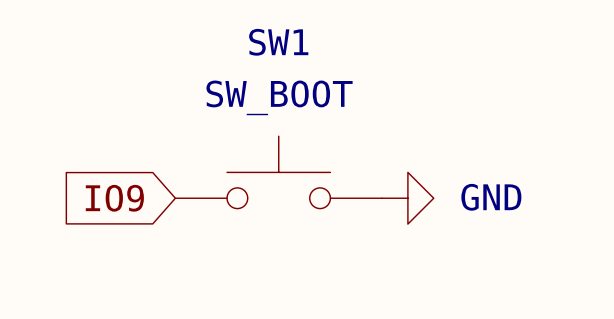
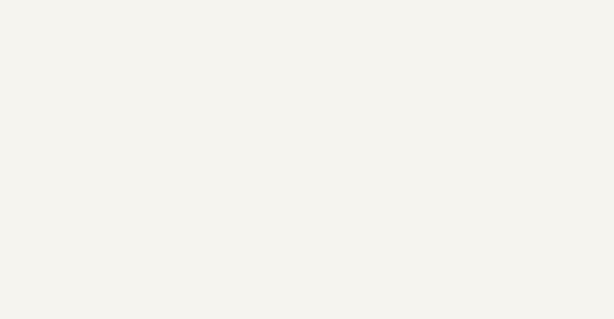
SW1: SW_BOOT (278, 172) -> none
global label: IO9 (114, 198) -> none
power symbol: GND (407, 198) -> none

